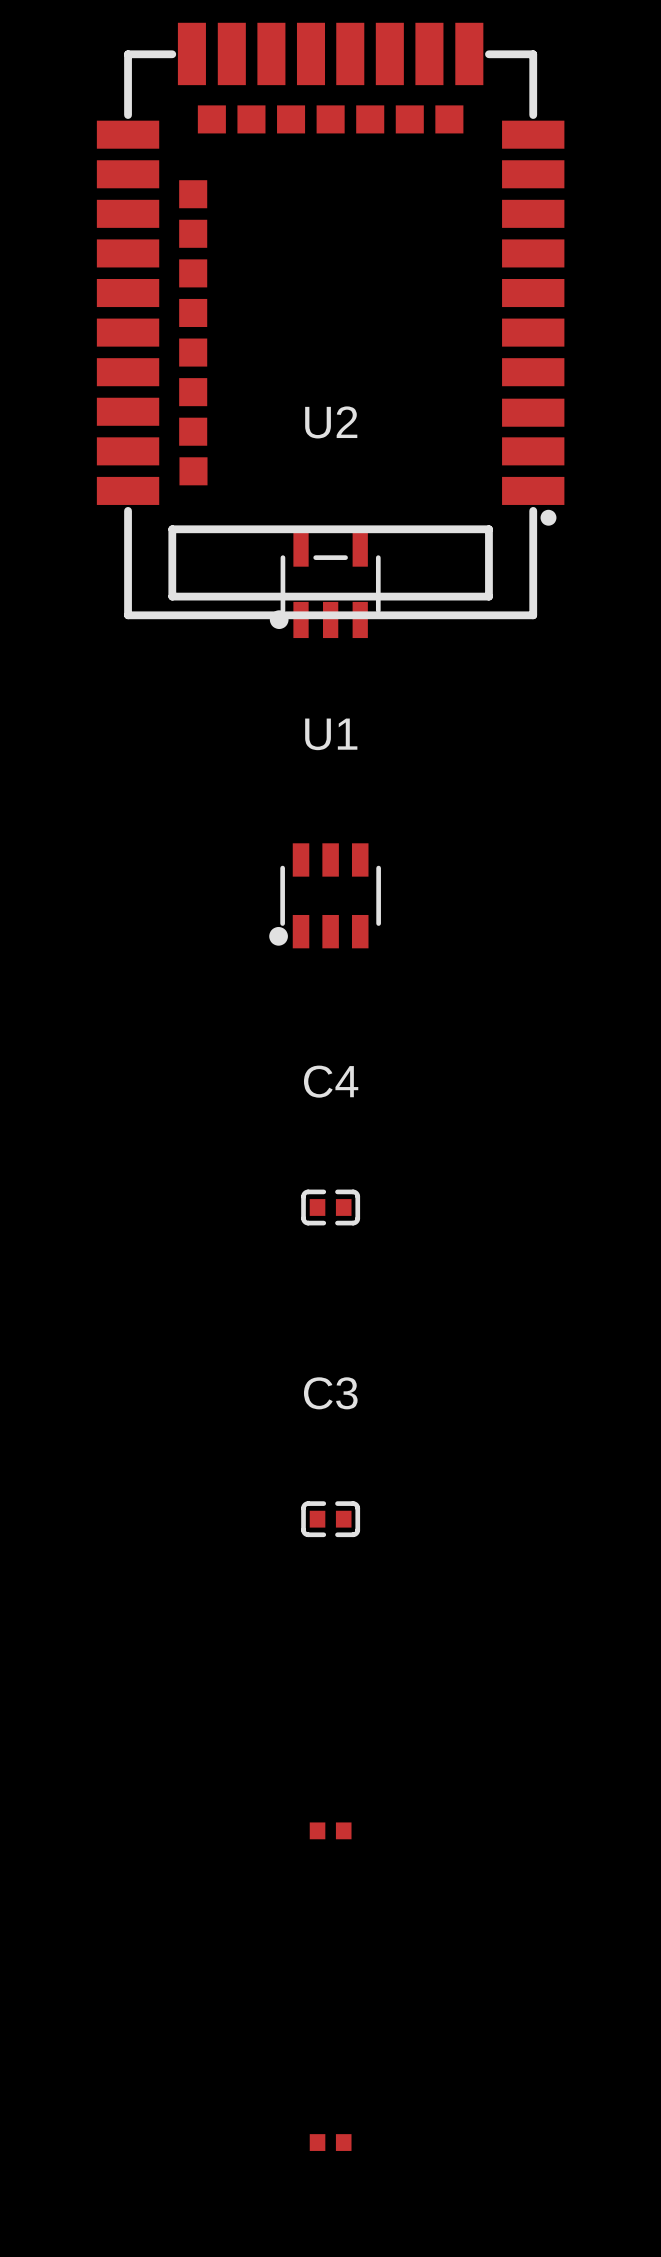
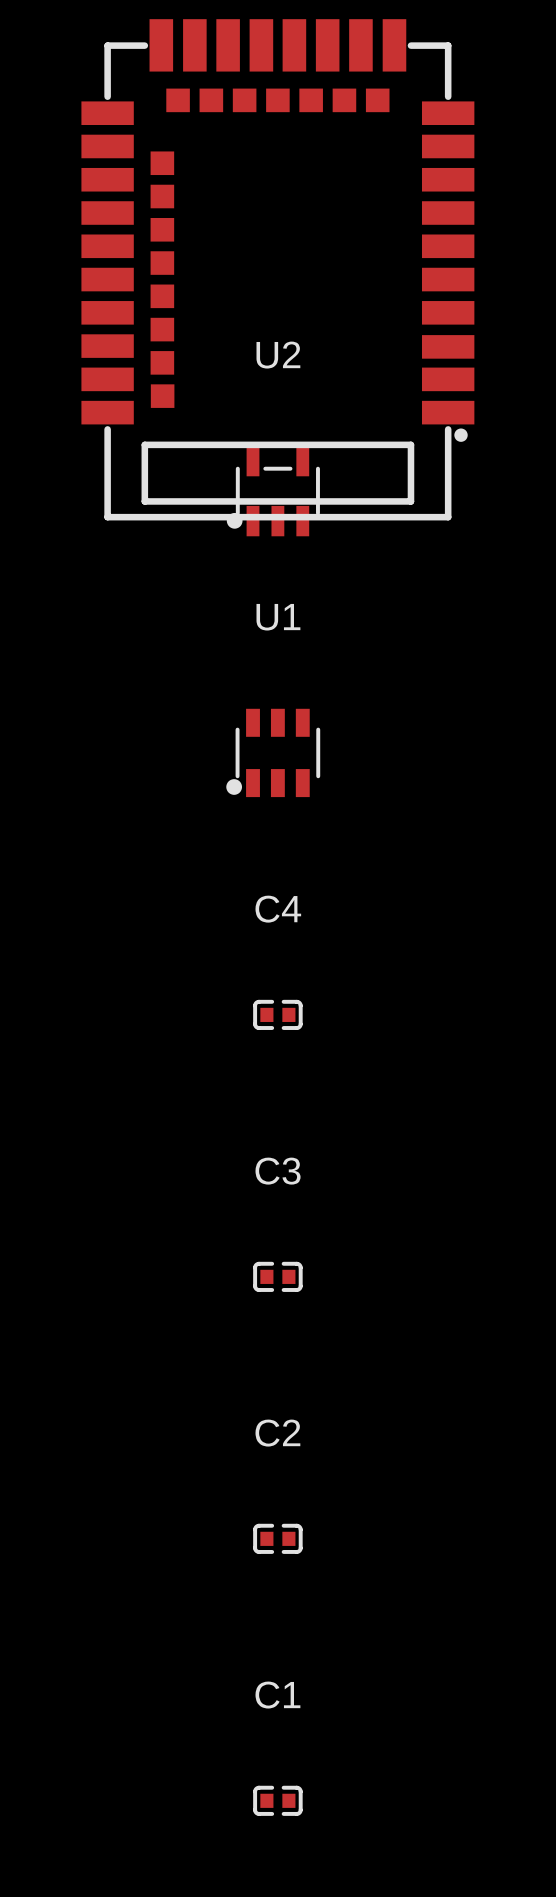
C2: none -> (277, 1538)
C1: none -> (277, 1800)

